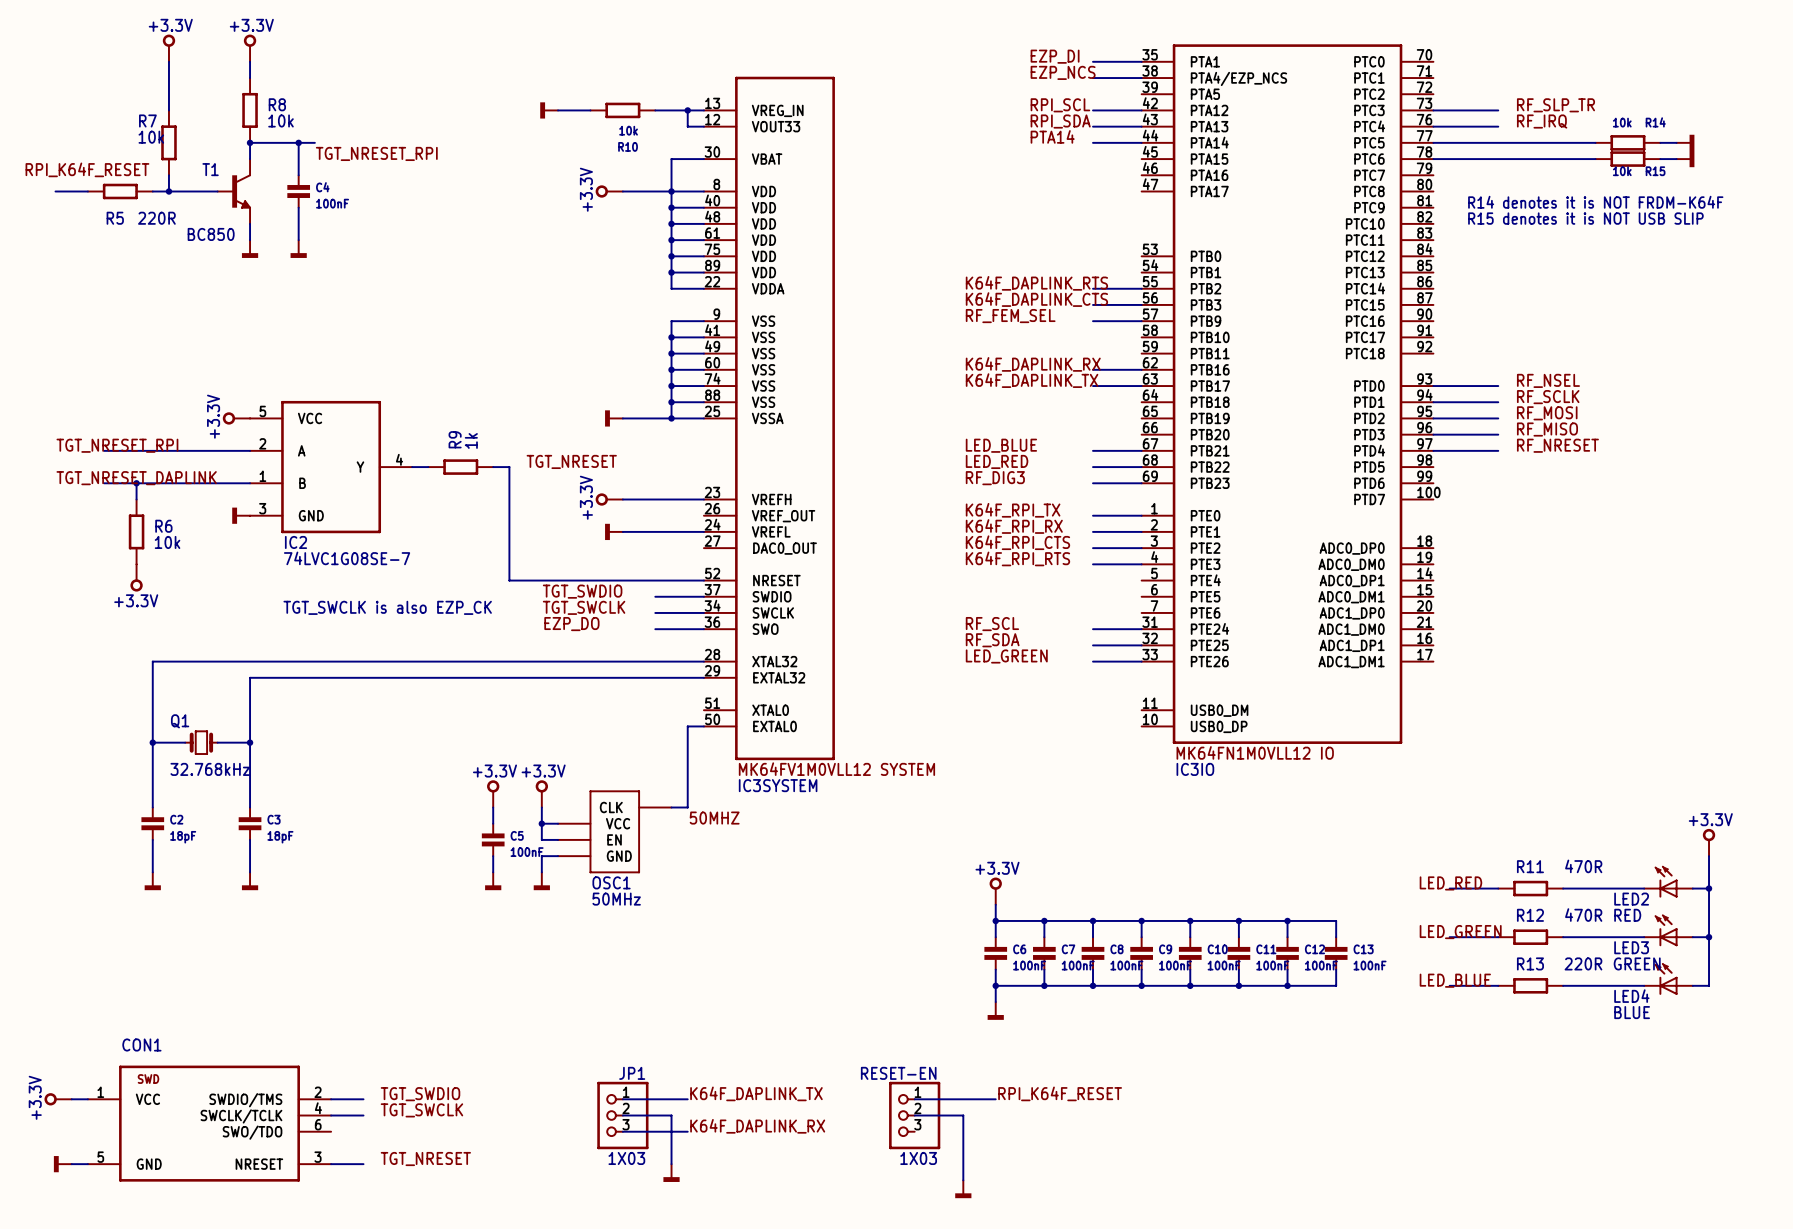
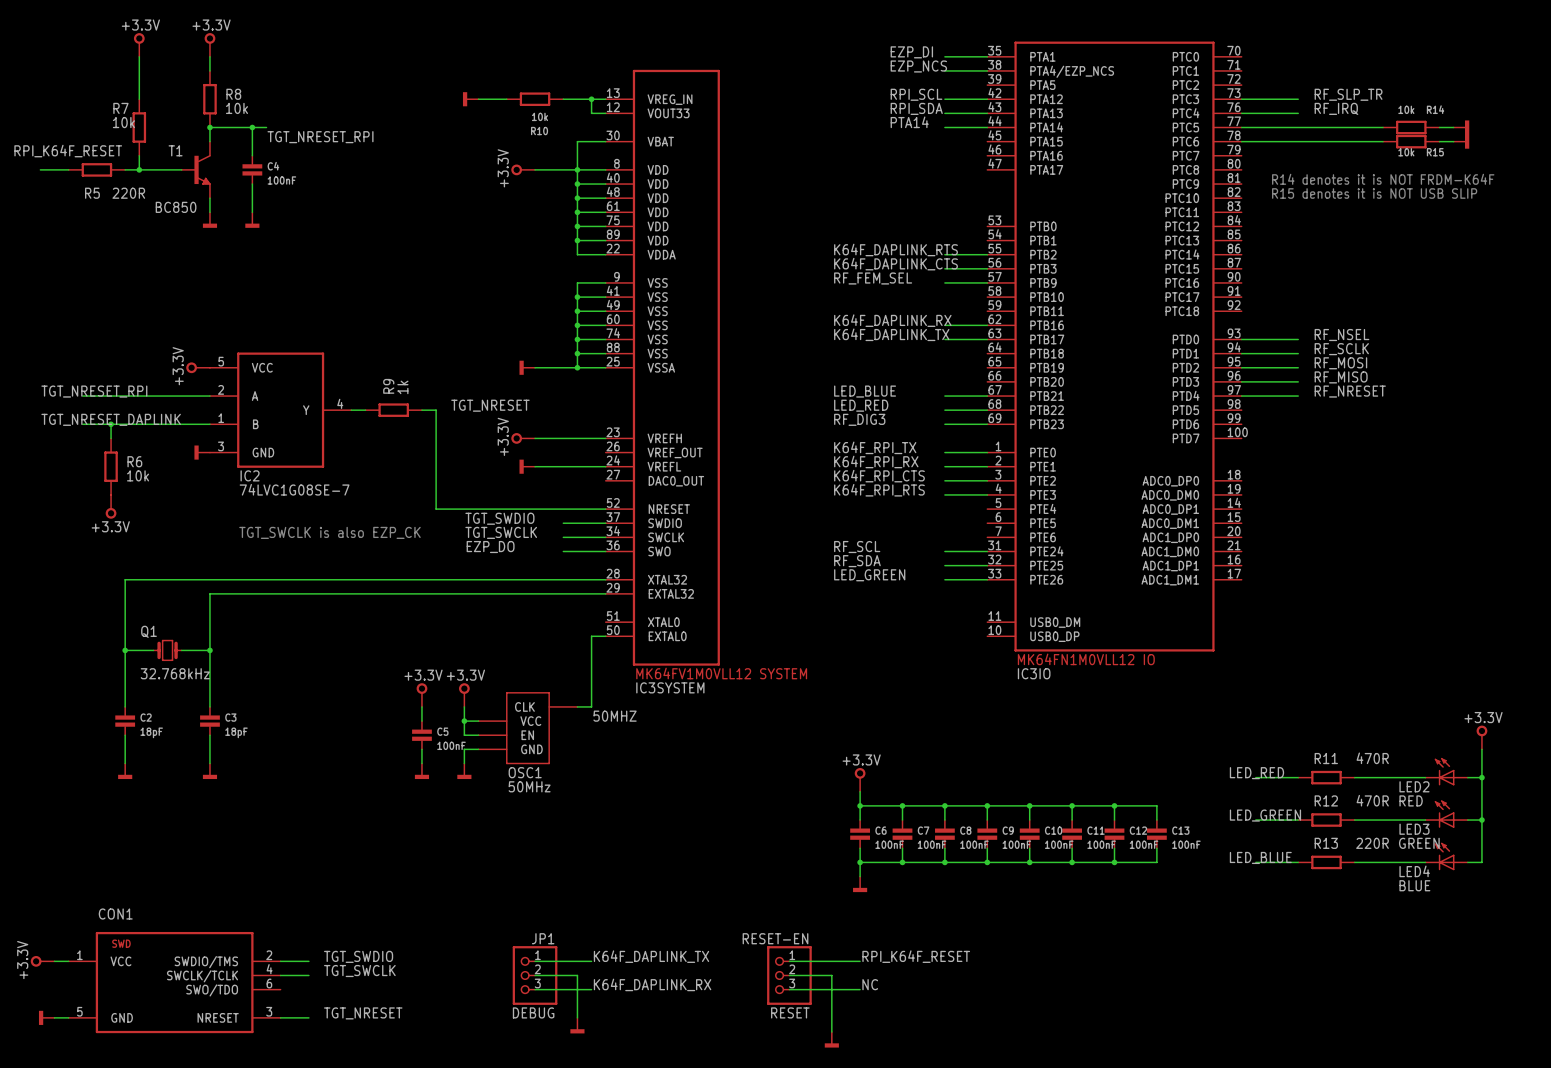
label: none -> NC (870, 984)
wire: none -> (789, 989) (860, 989)
JP1 value: 1X03 (626, 1158) -> DEBUG (533, 1012)
RESET-EN value: 1X03 (918, 1158) -> RESET (790, 1012)

